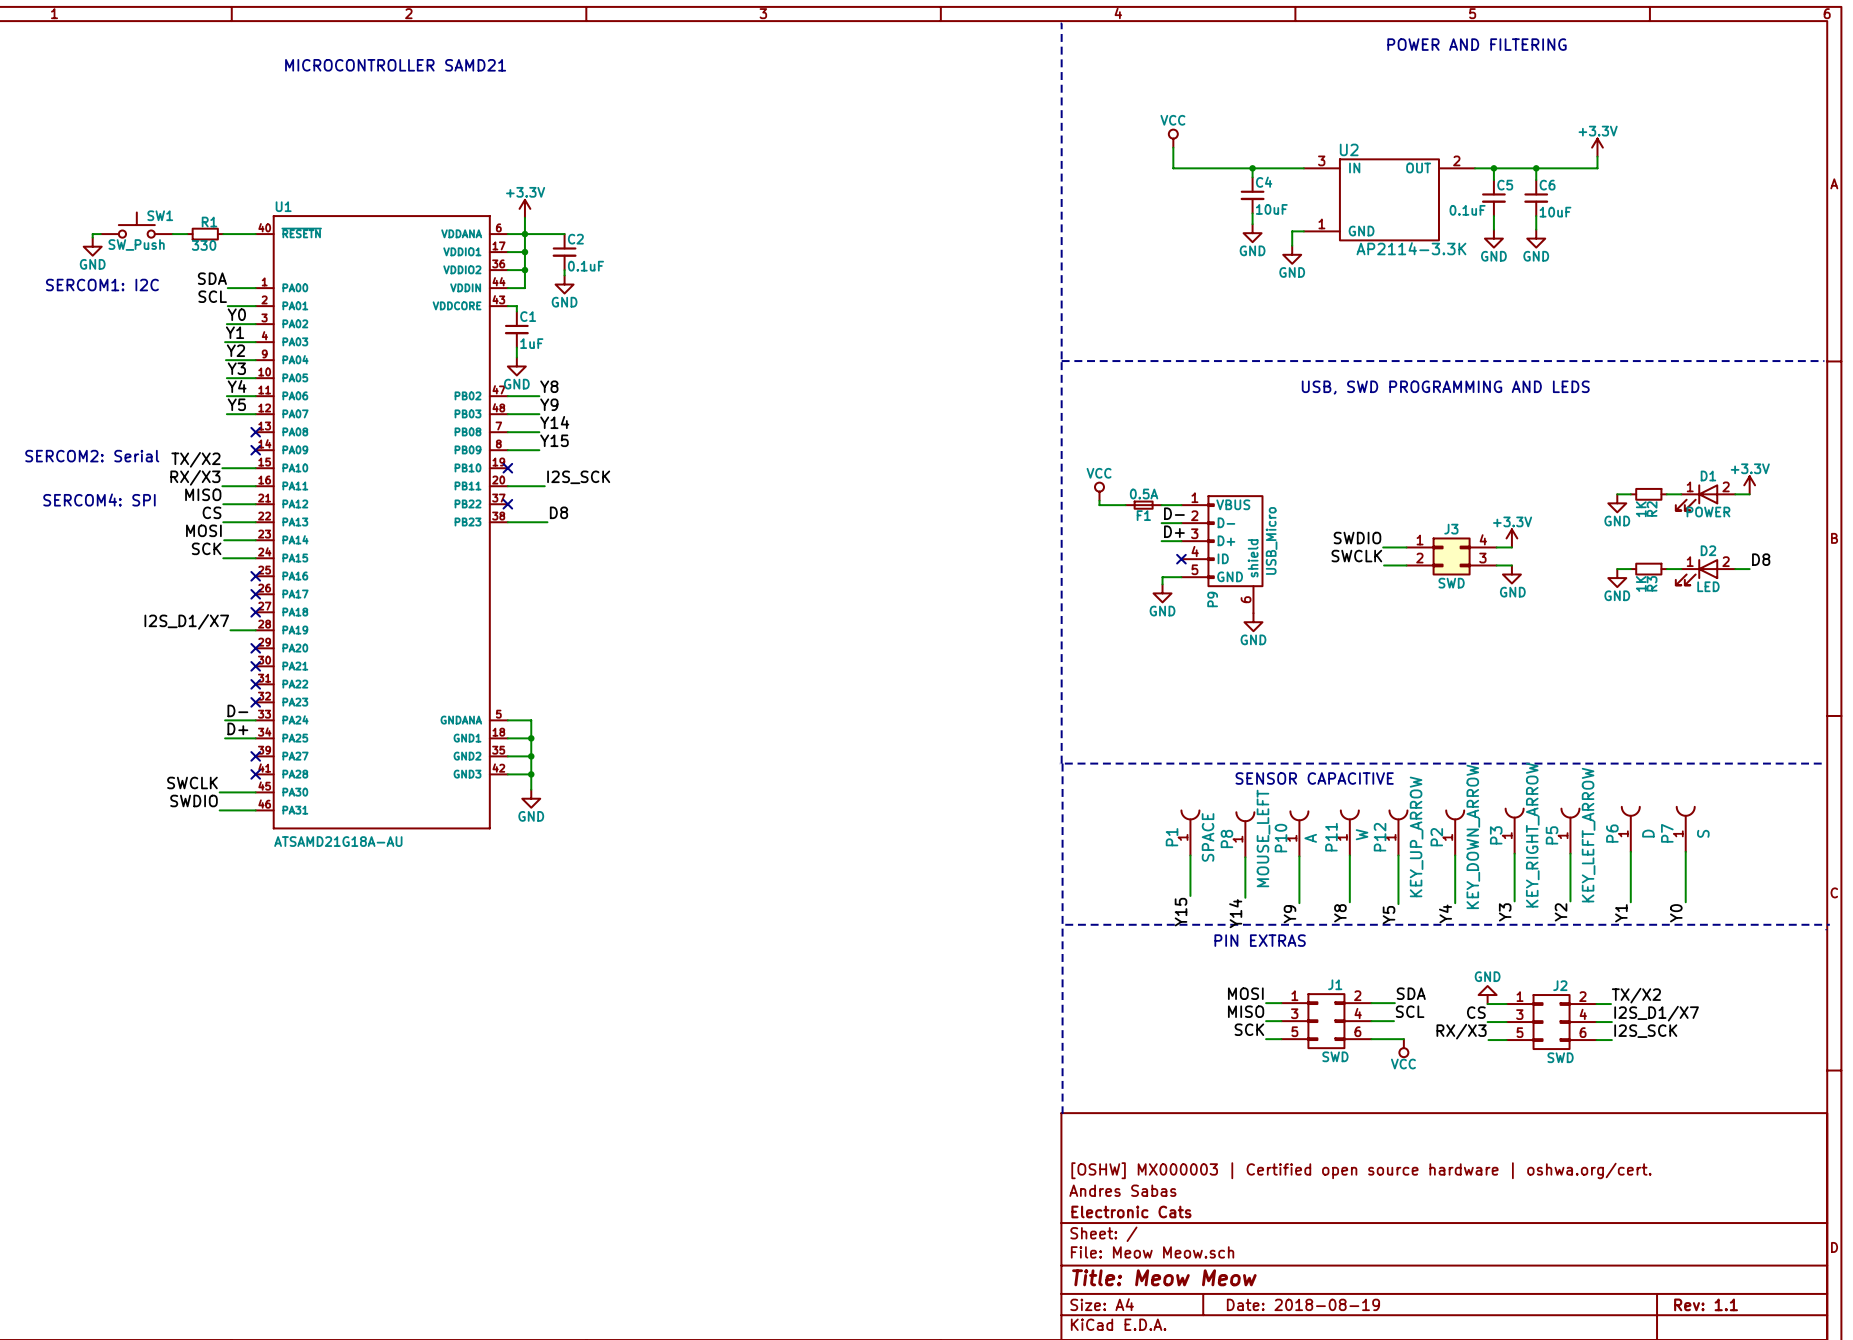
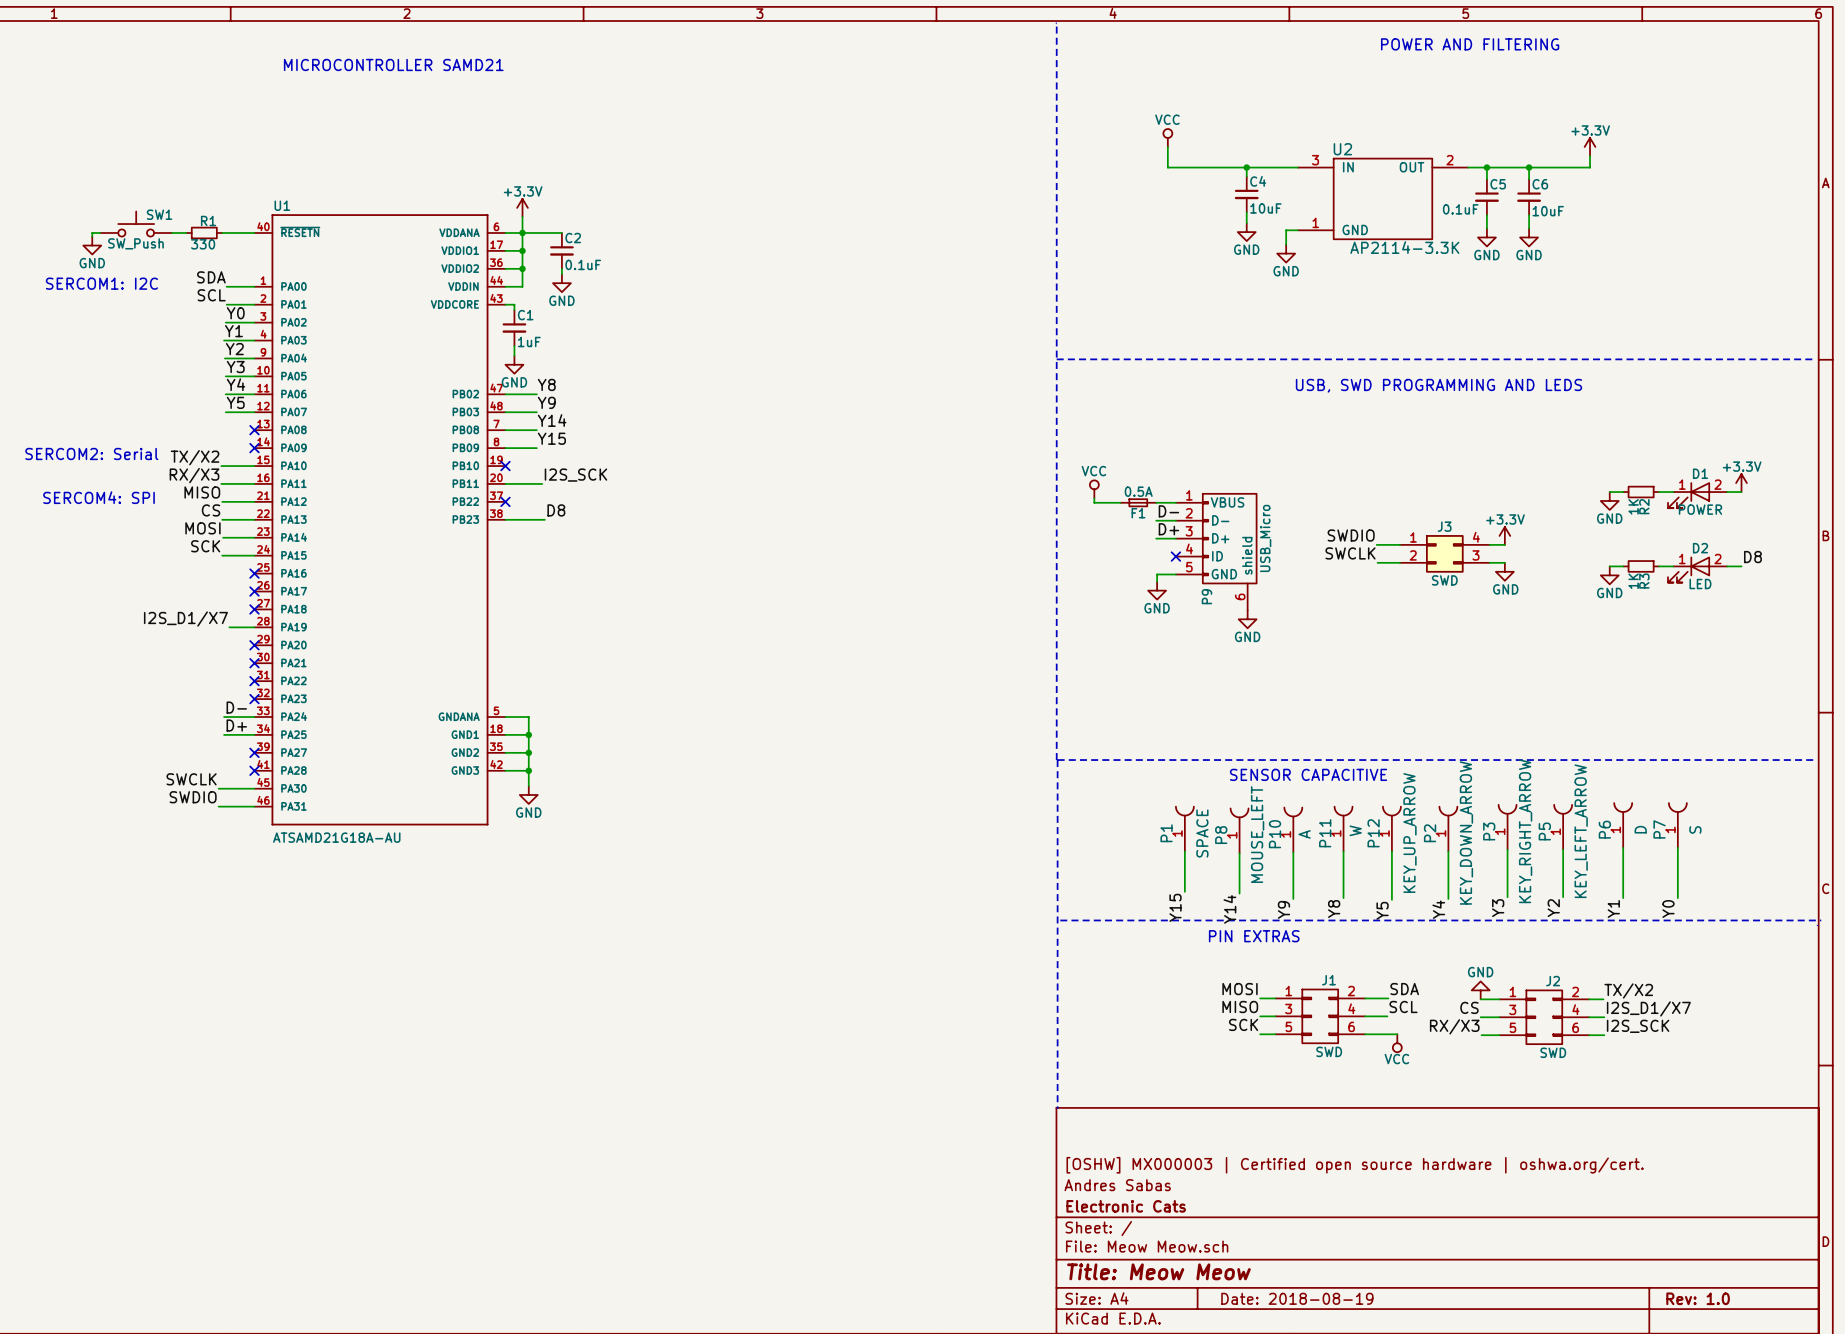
title block: Rev: 1.1 (1706, 1304) -> Rev: 1.0 (1698, 1298)

